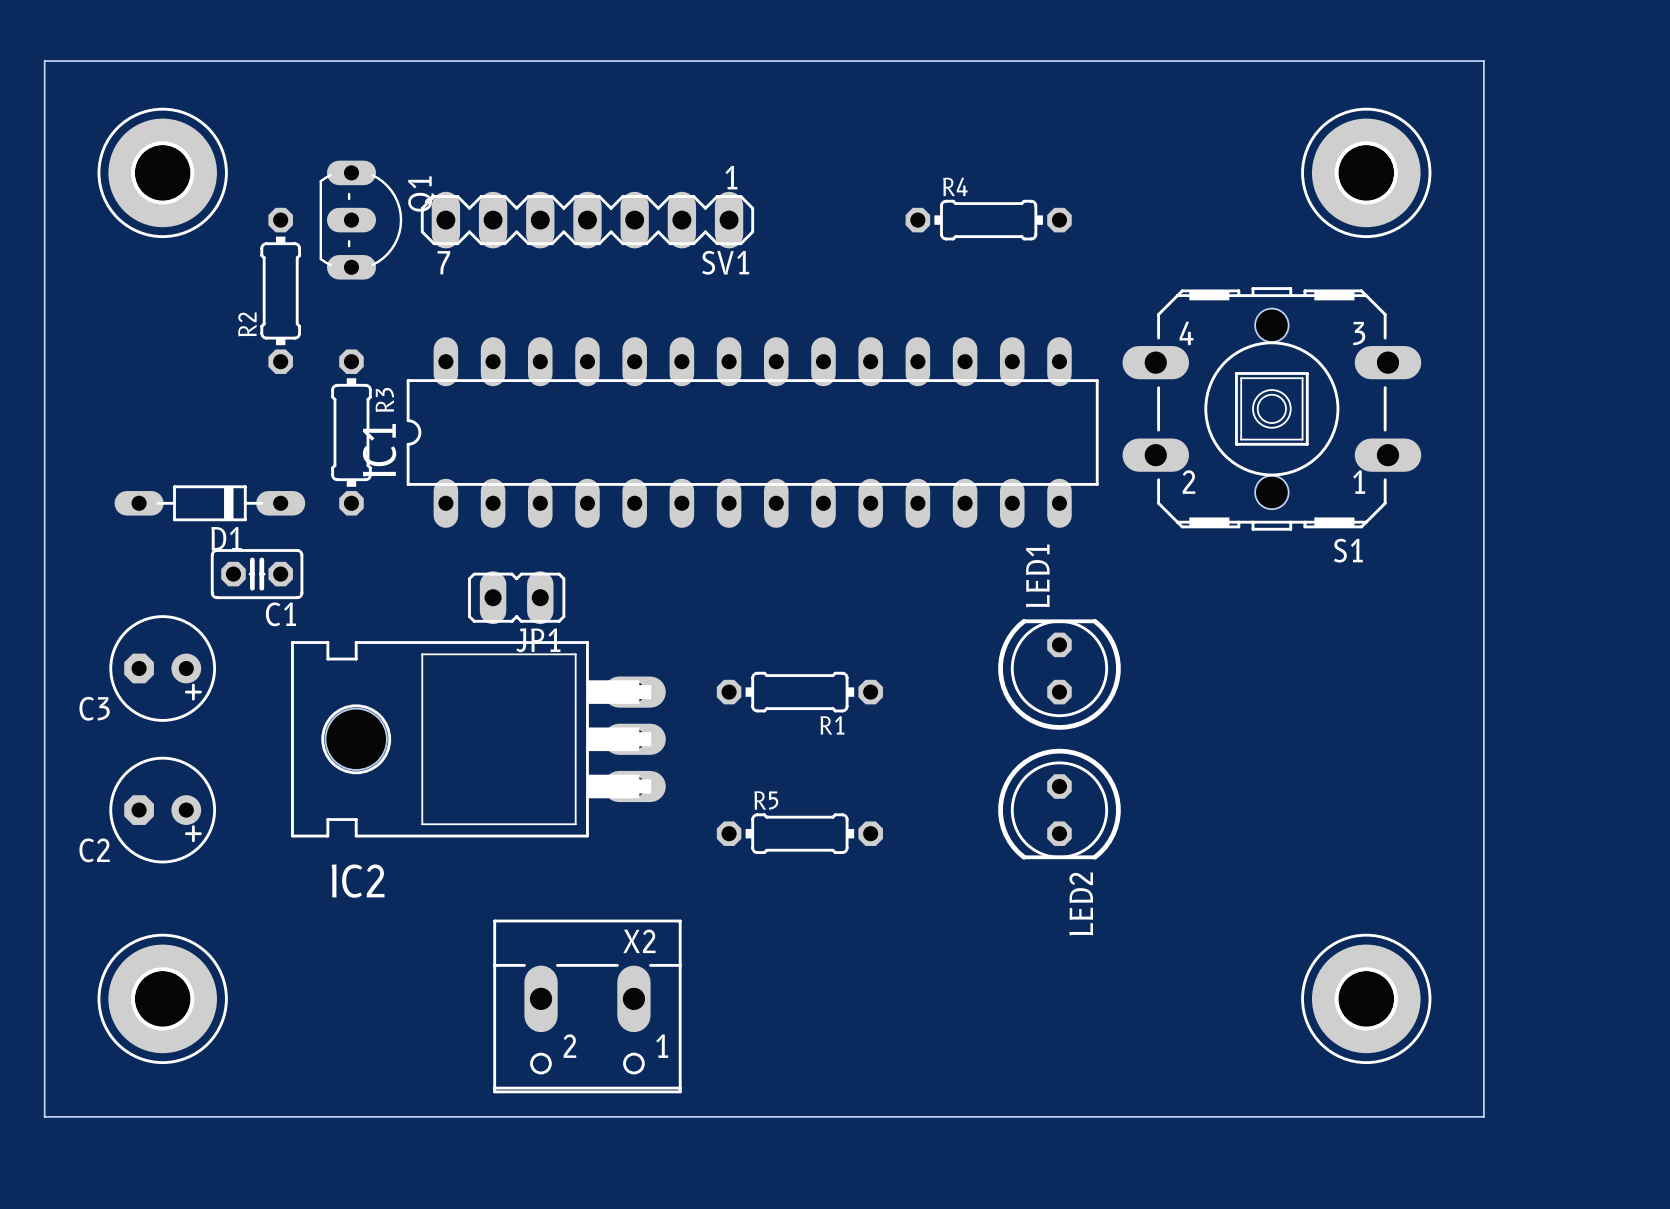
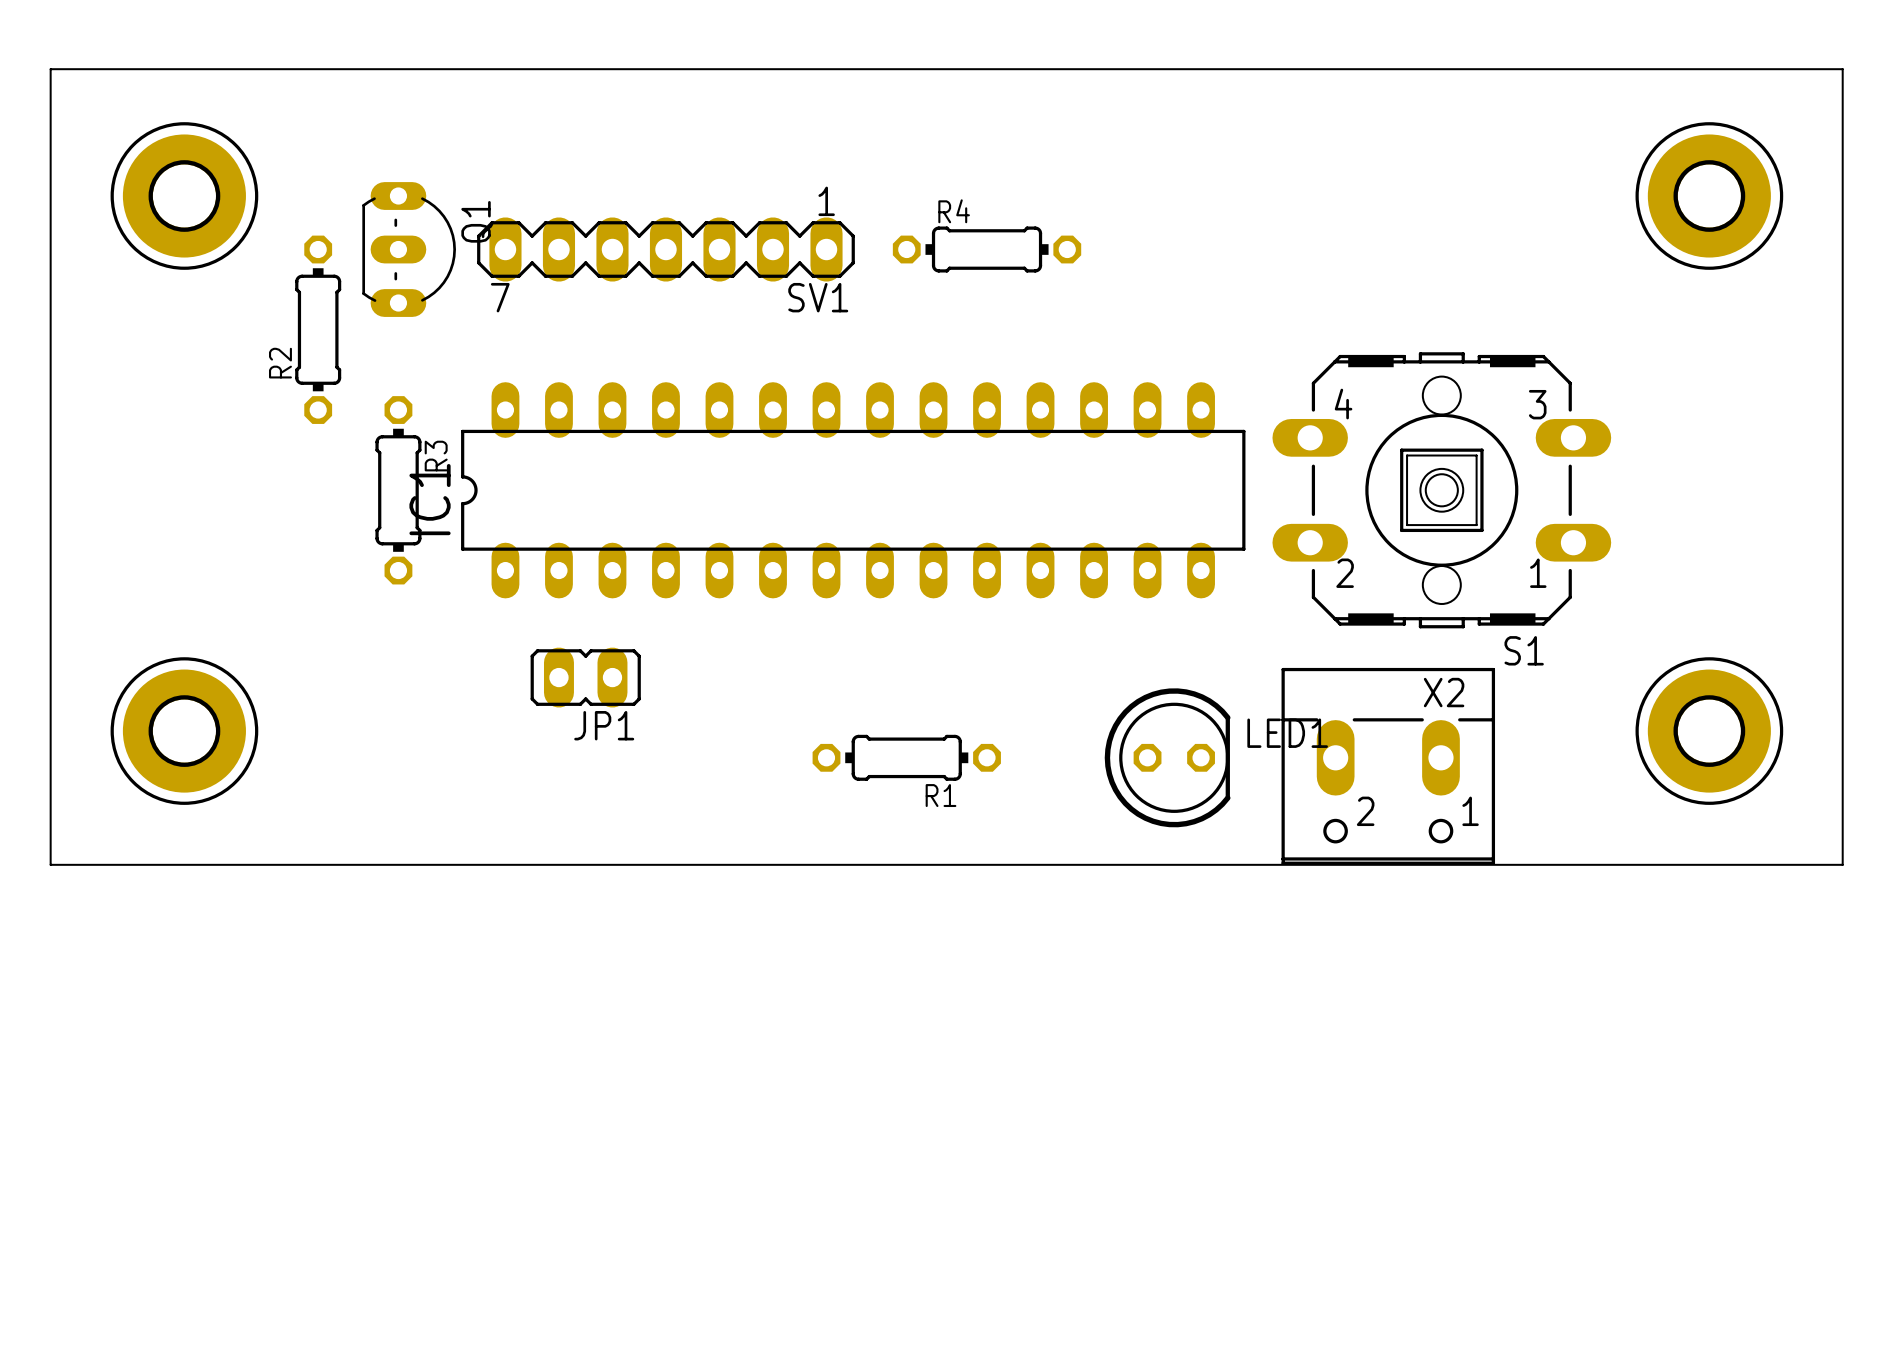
board edge: (1483, 61) (1483, 1116) (44, 1116) (44, 762) -> (1682, 69) (1842, 69) (1842, 864) (50, 864)
part position: (1366, 172) -> (1709, 196)
R4 position: (988, 220) -> (987, 249)
S1 position: (1271, 408) -> (1441, 490)
D1: (209, 503) -> none
C1: (257, 574) -> none
part: none -> (1709, 731)
C3: (162, 668) -> none
LED1 rotation: 0° (1059, 674) -> 90° clockwise (1167, 757)
R1 position: (799, 692) -> (906, 757)
IC2: (478, 739) -> none
LED2: (1059, 804) -> none
C2: (162, 810) -> none
R5: (799, 833) -> none
part position: (162, 998) -> (184, 731)
part: (1366, 998) -> none
X2 position: (587, 1006) -> (1388, 766)

